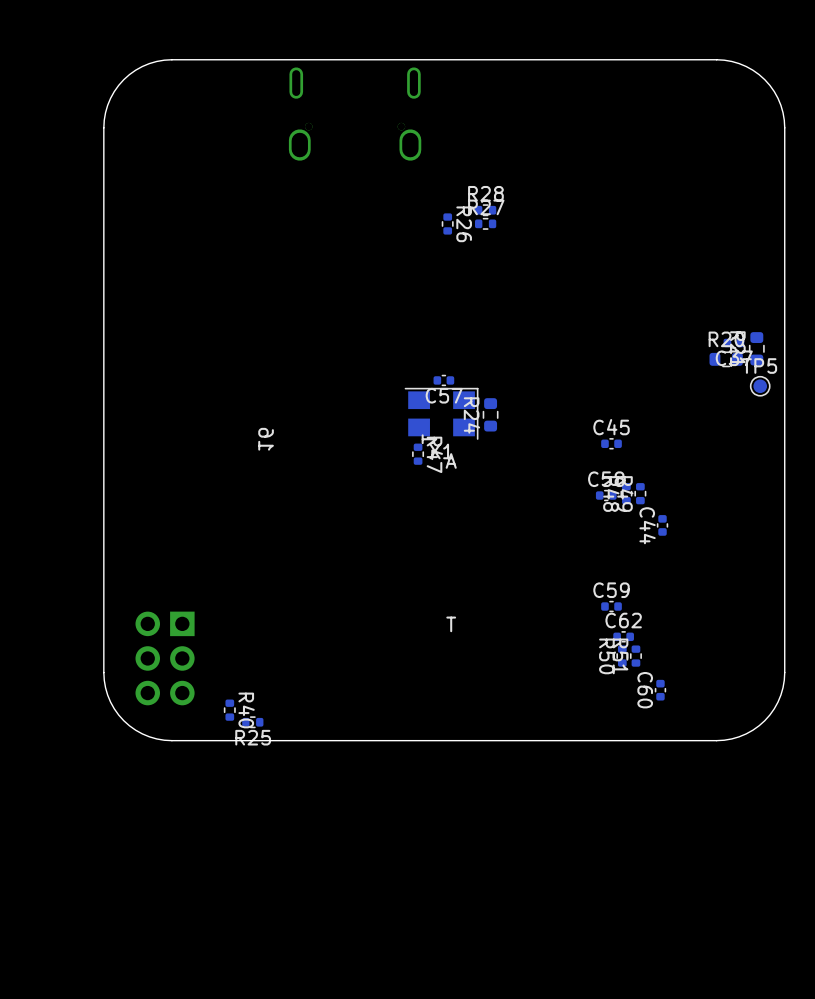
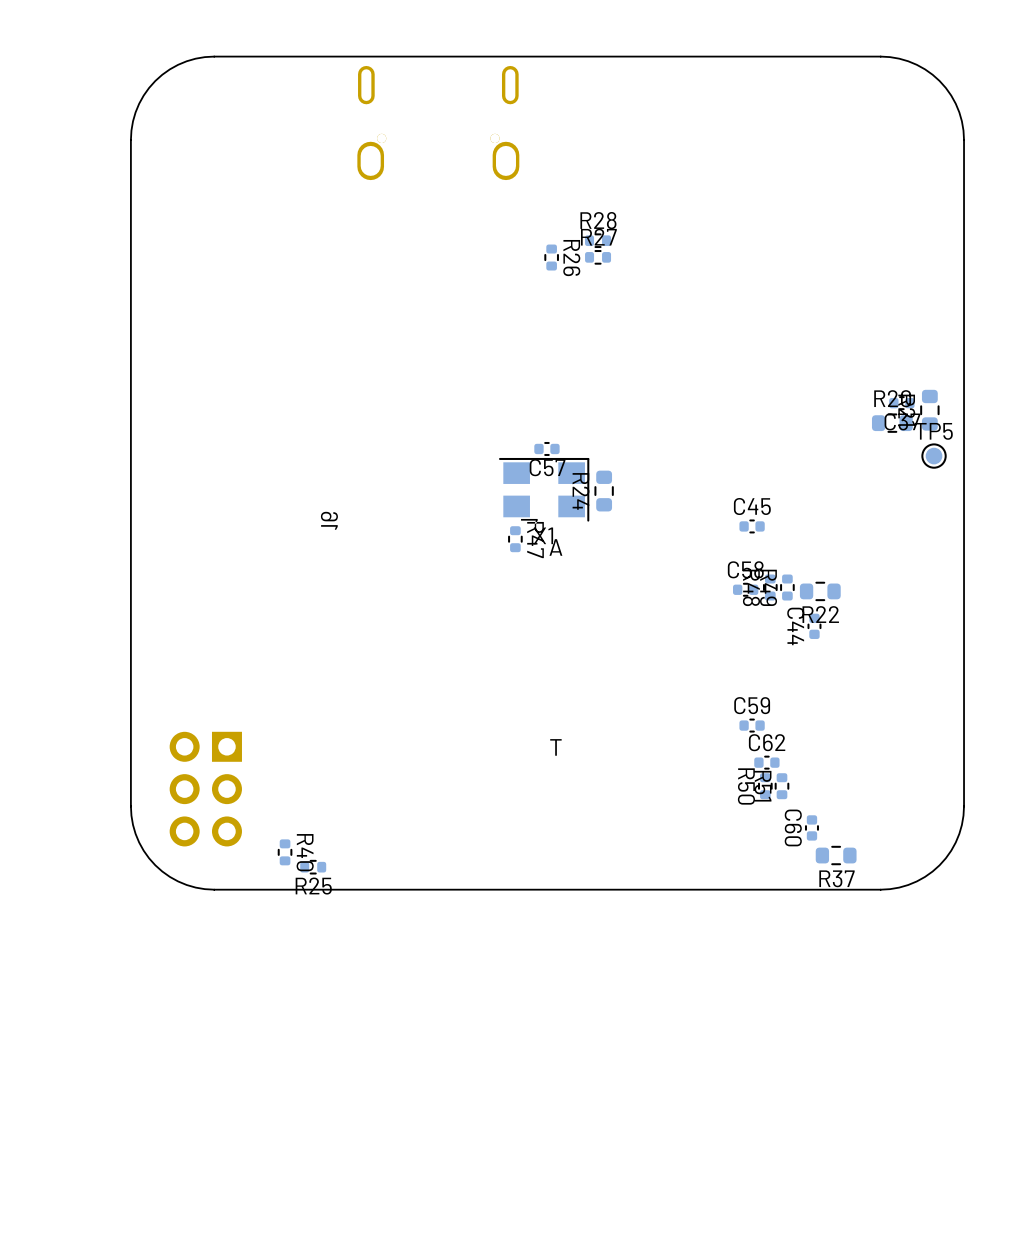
R22: none -> (820, 591)
R37: none -> (836, 855)

